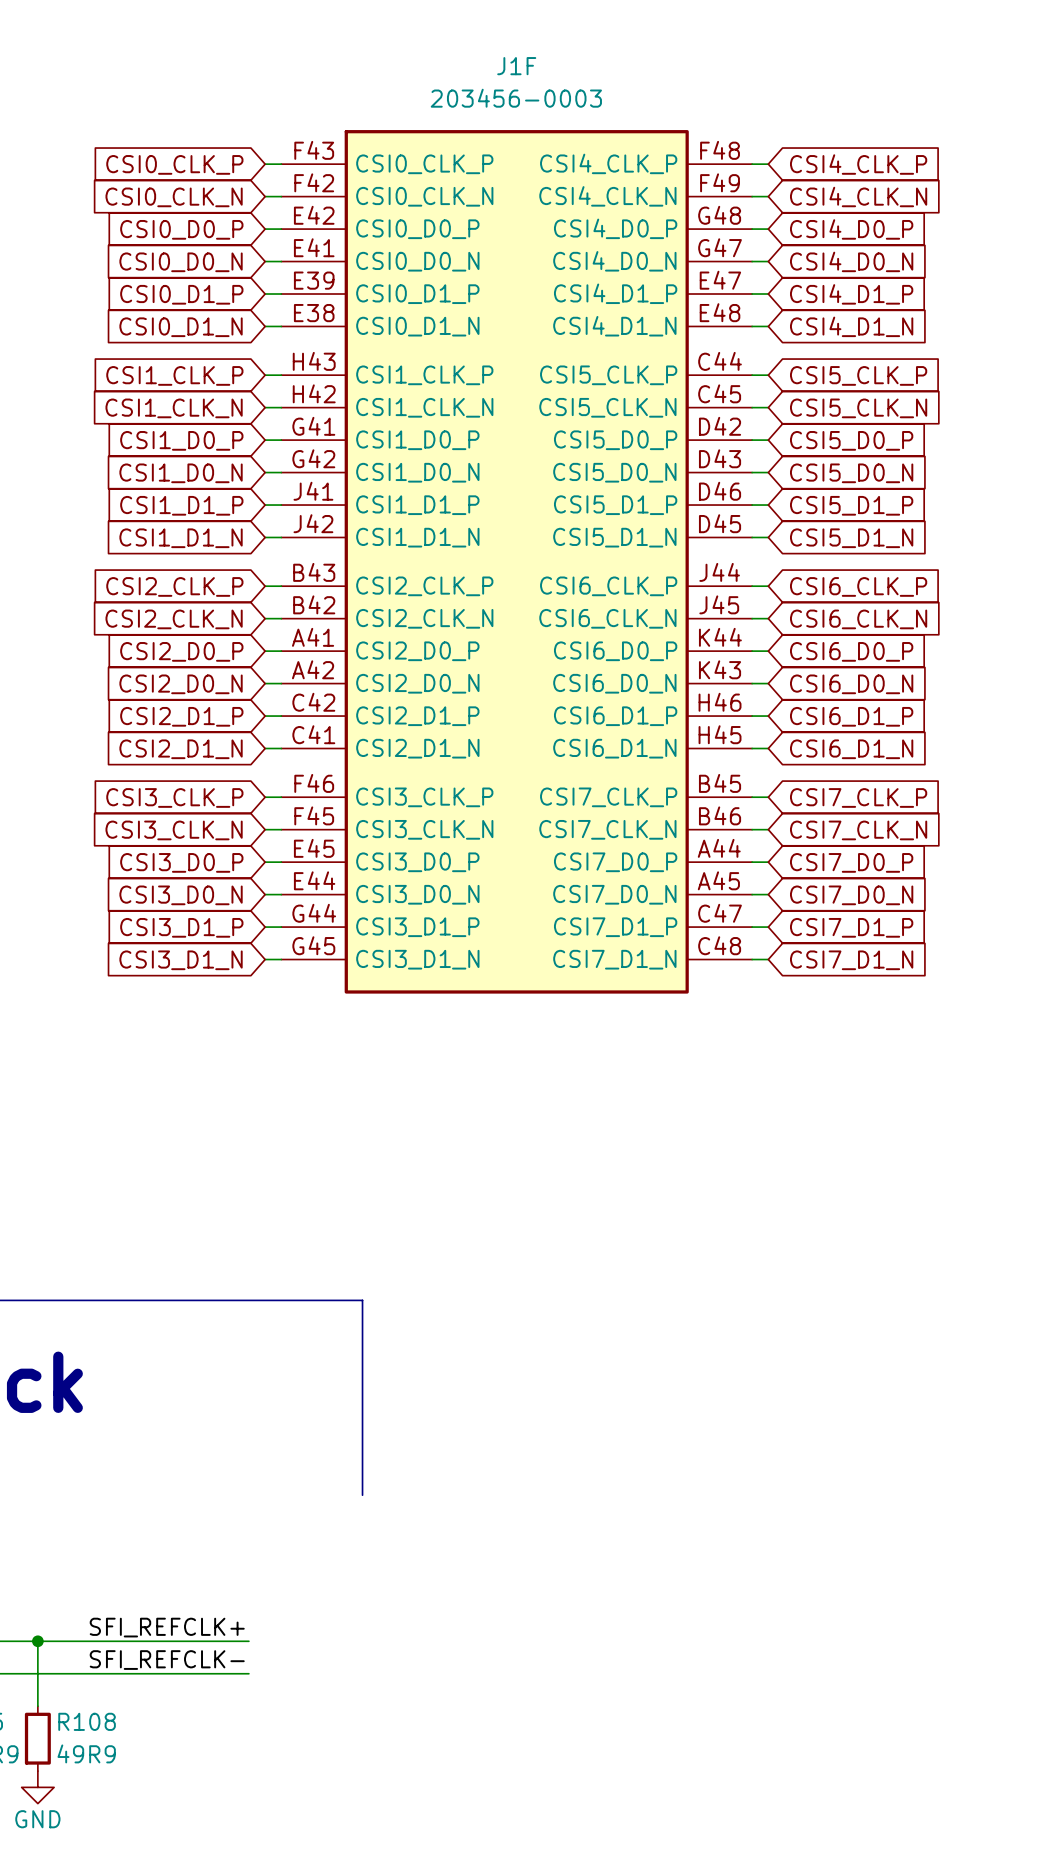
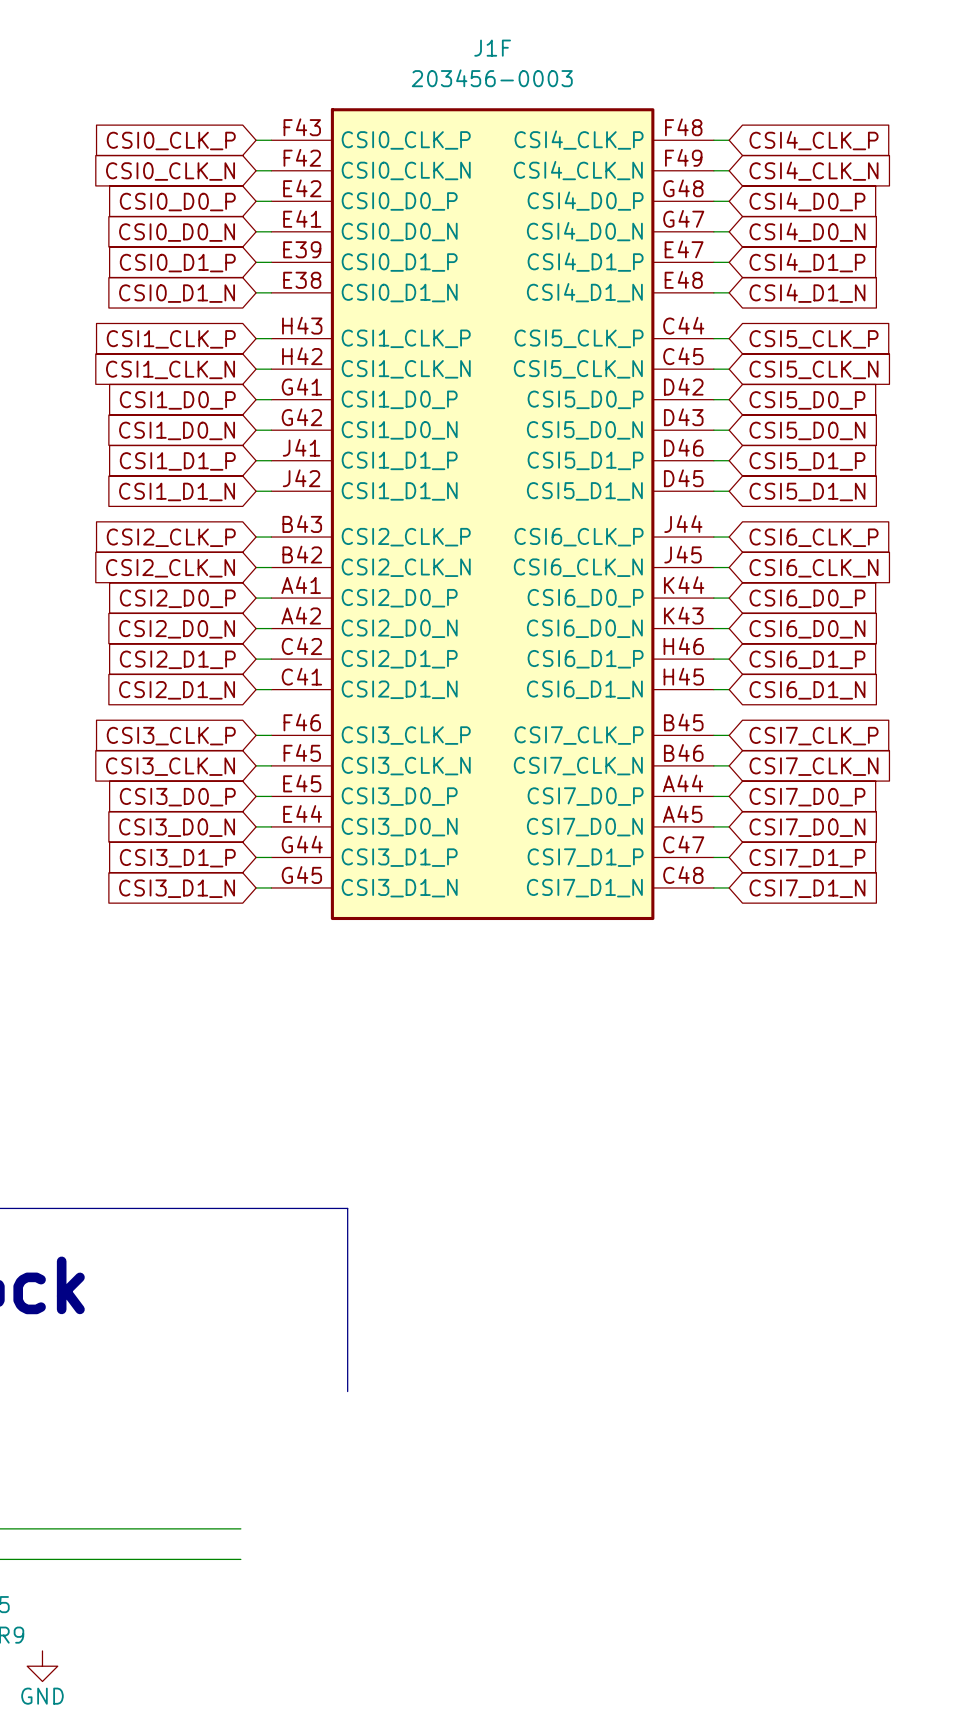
label: SFI_REFCLK+ (167, 1627) -> none
wire: (37, 1641) (37, 1706) -> none
junction: (37, 1641) -> none
label: SFI_REFCLK- (167, 1660) -> none
R108: (37, 1738) -> none

